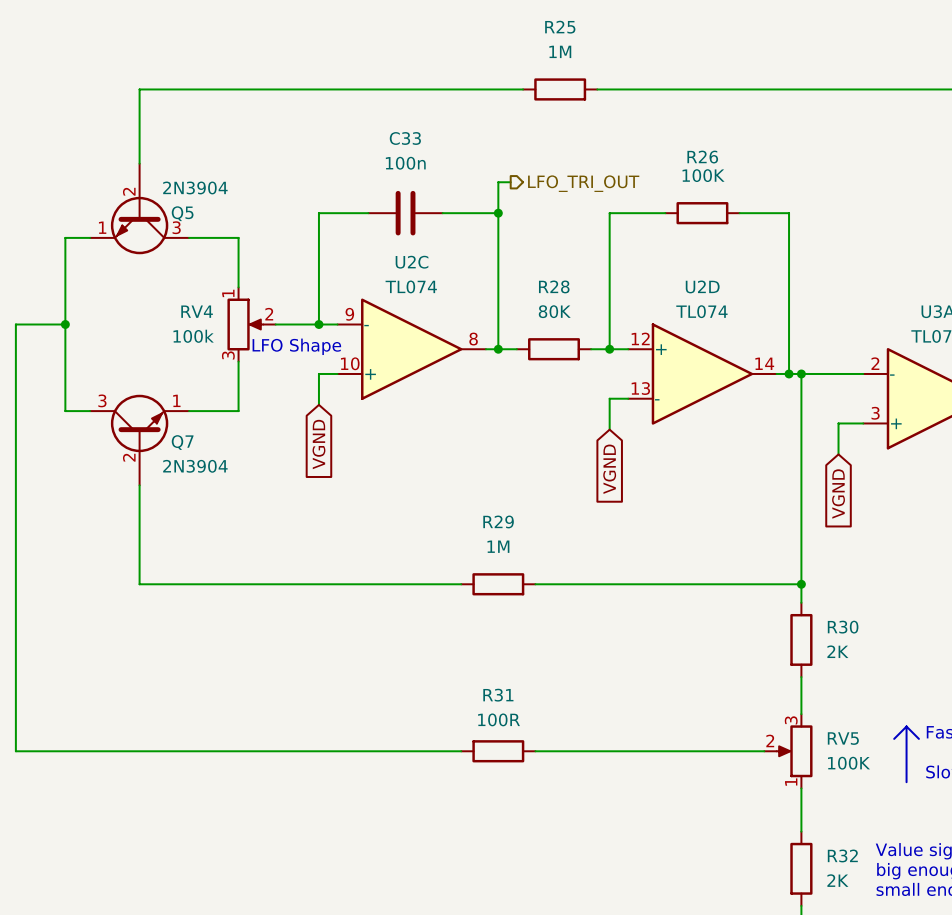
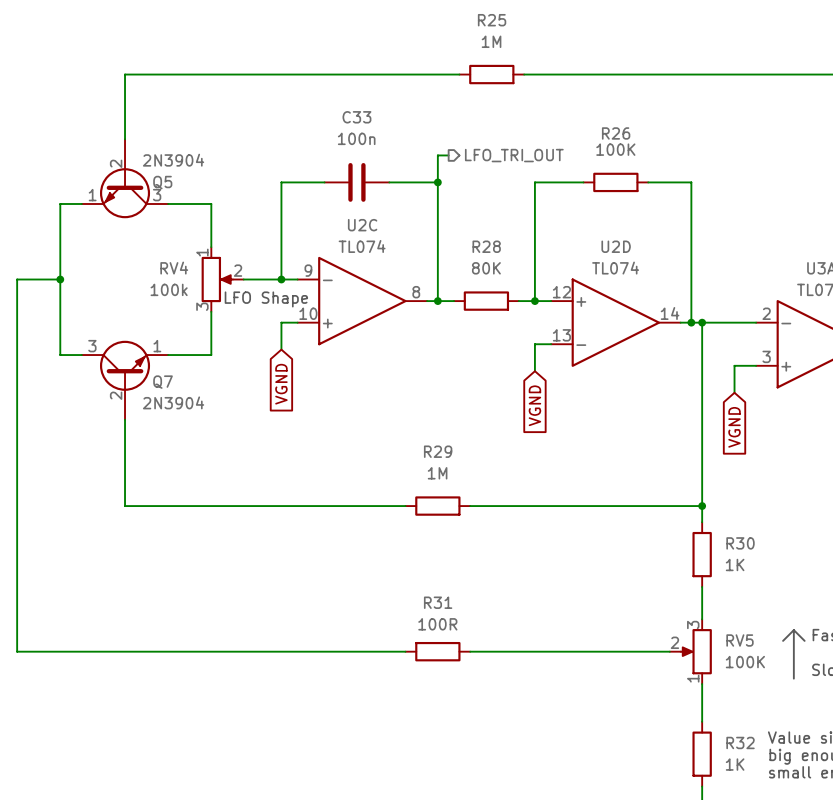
R30 value: 2K (837, 651) -> 1K (735, 564)
R32 value: 2K (837, 880) -> 1K (735, 764)

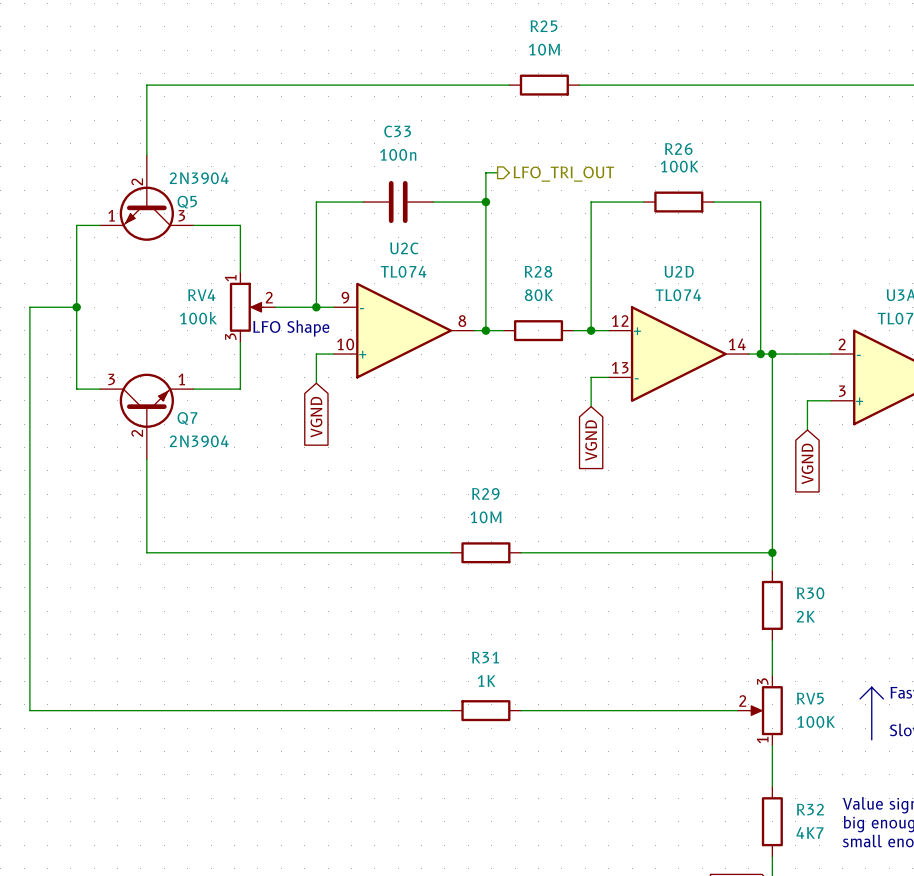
R25 value: 1M (491, 41) -> 10M (544, 49)
R29 value: 1M (437, 473) -> 10M (485, 517)
R30 value: 1K (735, 564) -> 2K (805, 616)
R31 value: 100R (437, 624) -> 1K (486, 680)
R32 value: 1K (735, 764) -> 4K7 (809, 832)

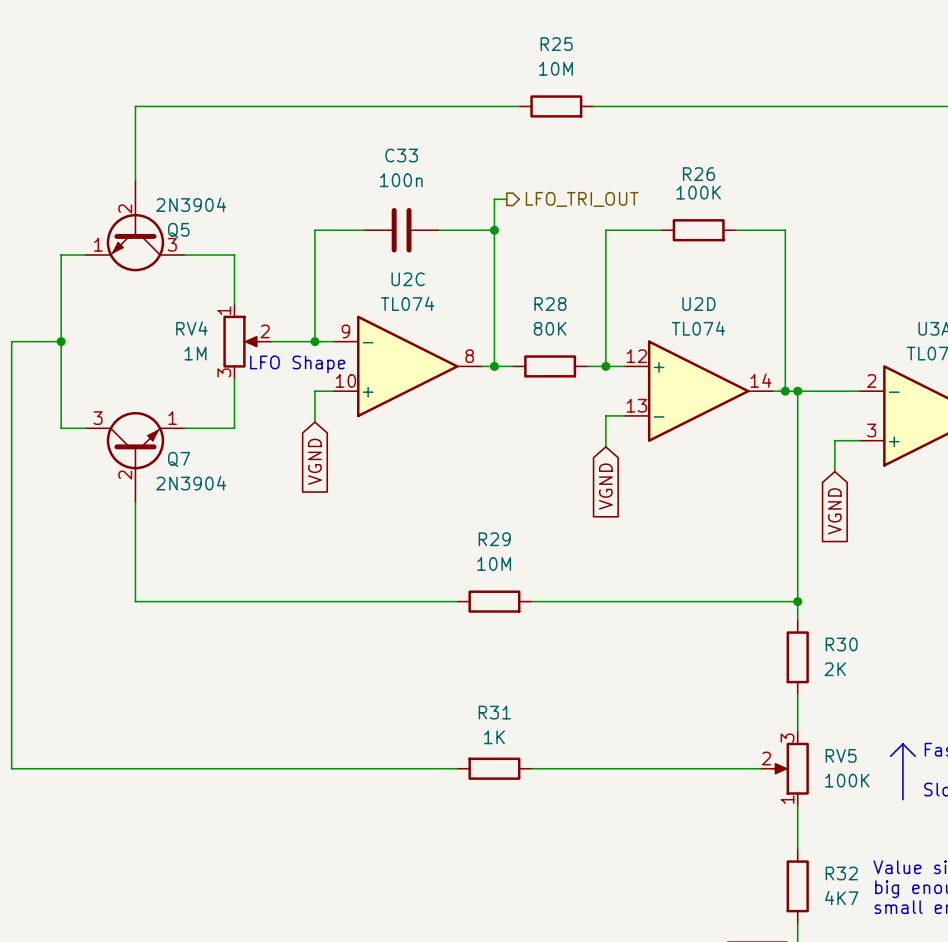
RV4 value: 100k (198, 318) -> 1M (195, 353)

